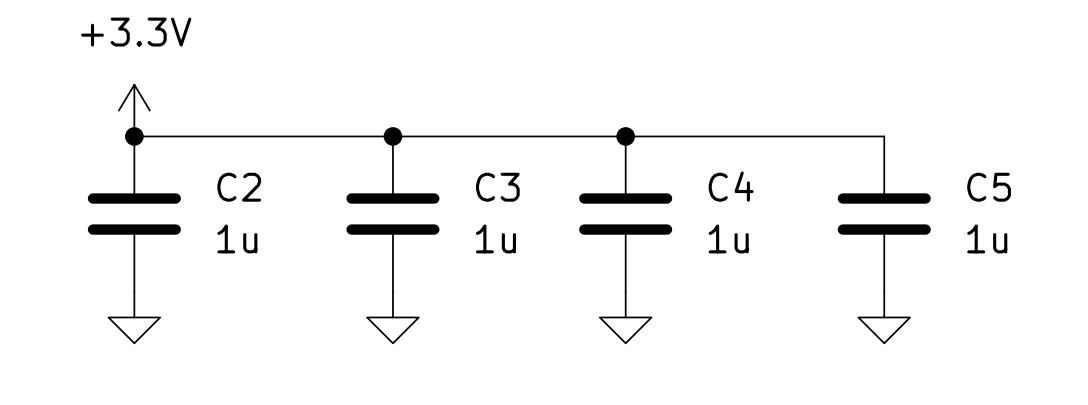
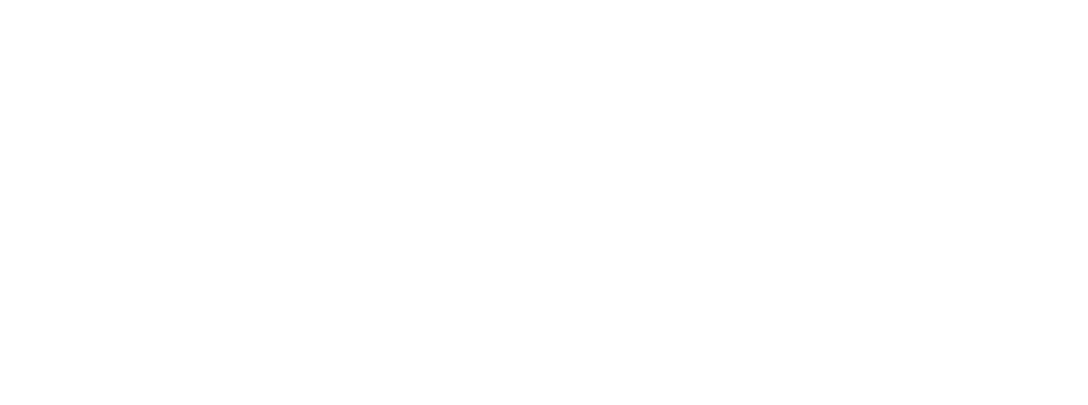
power symbol: +3.3V (134, 110) -> none
wire: (134, 136) (884, 136) -> none
junction: (134, 136) -> none
junction: (392, 136) -> none
junction: (625, 136) -> none
C2: 1u (134, 214) -> none
C3: 1u (392, 214) -> none
C4: 1u (625, 214) -> none
C5: 1u (884, 214) -> none
power symbol: (134, 317) -> none
power symbol: (392, 317) -> none
power symbol: (625, 317) -> none
power symbol: (884, 317) -> none

